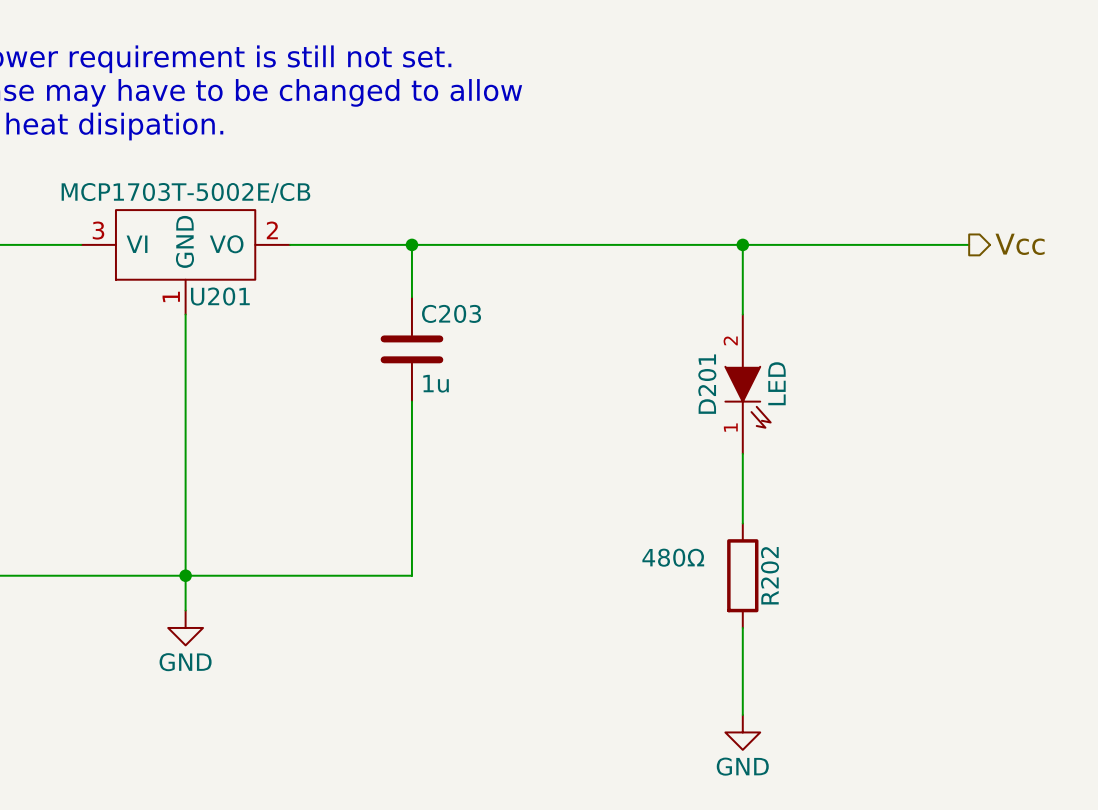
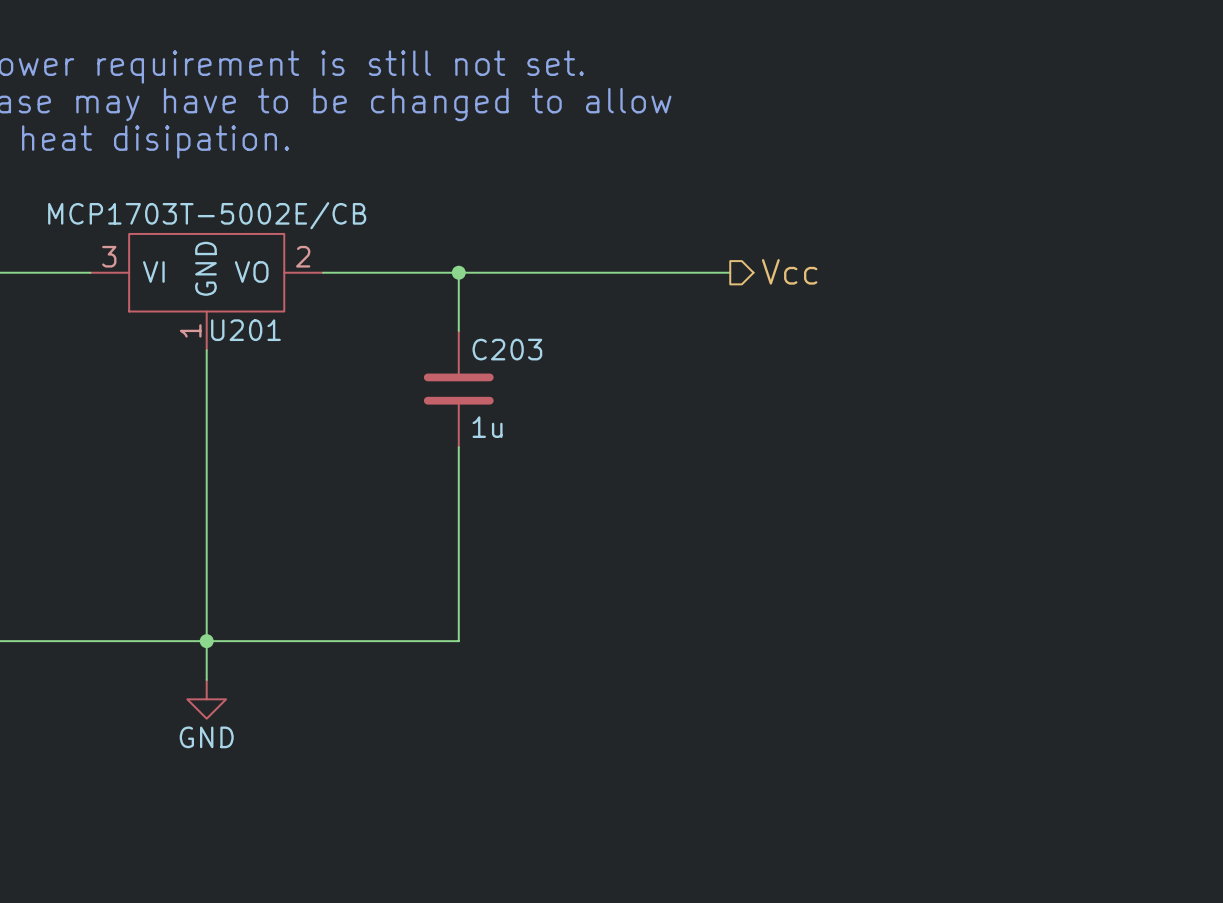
wire: (655, 244) (969, 244) -> none
wire: (742, 244) (742, 314) -> none
junction: (742, 244) -> none
hierarchical label position: Vcc (1020, 244) -> Vcc (789, 271)
D201: LED (748, 384) -> none
wire: (742, 453) (742, 523) -> none
R202: 480Ω (742, 575) -> none
wire: (742, 627) (742, 715) -> none
power symbol: GND (742, 732) -> none

